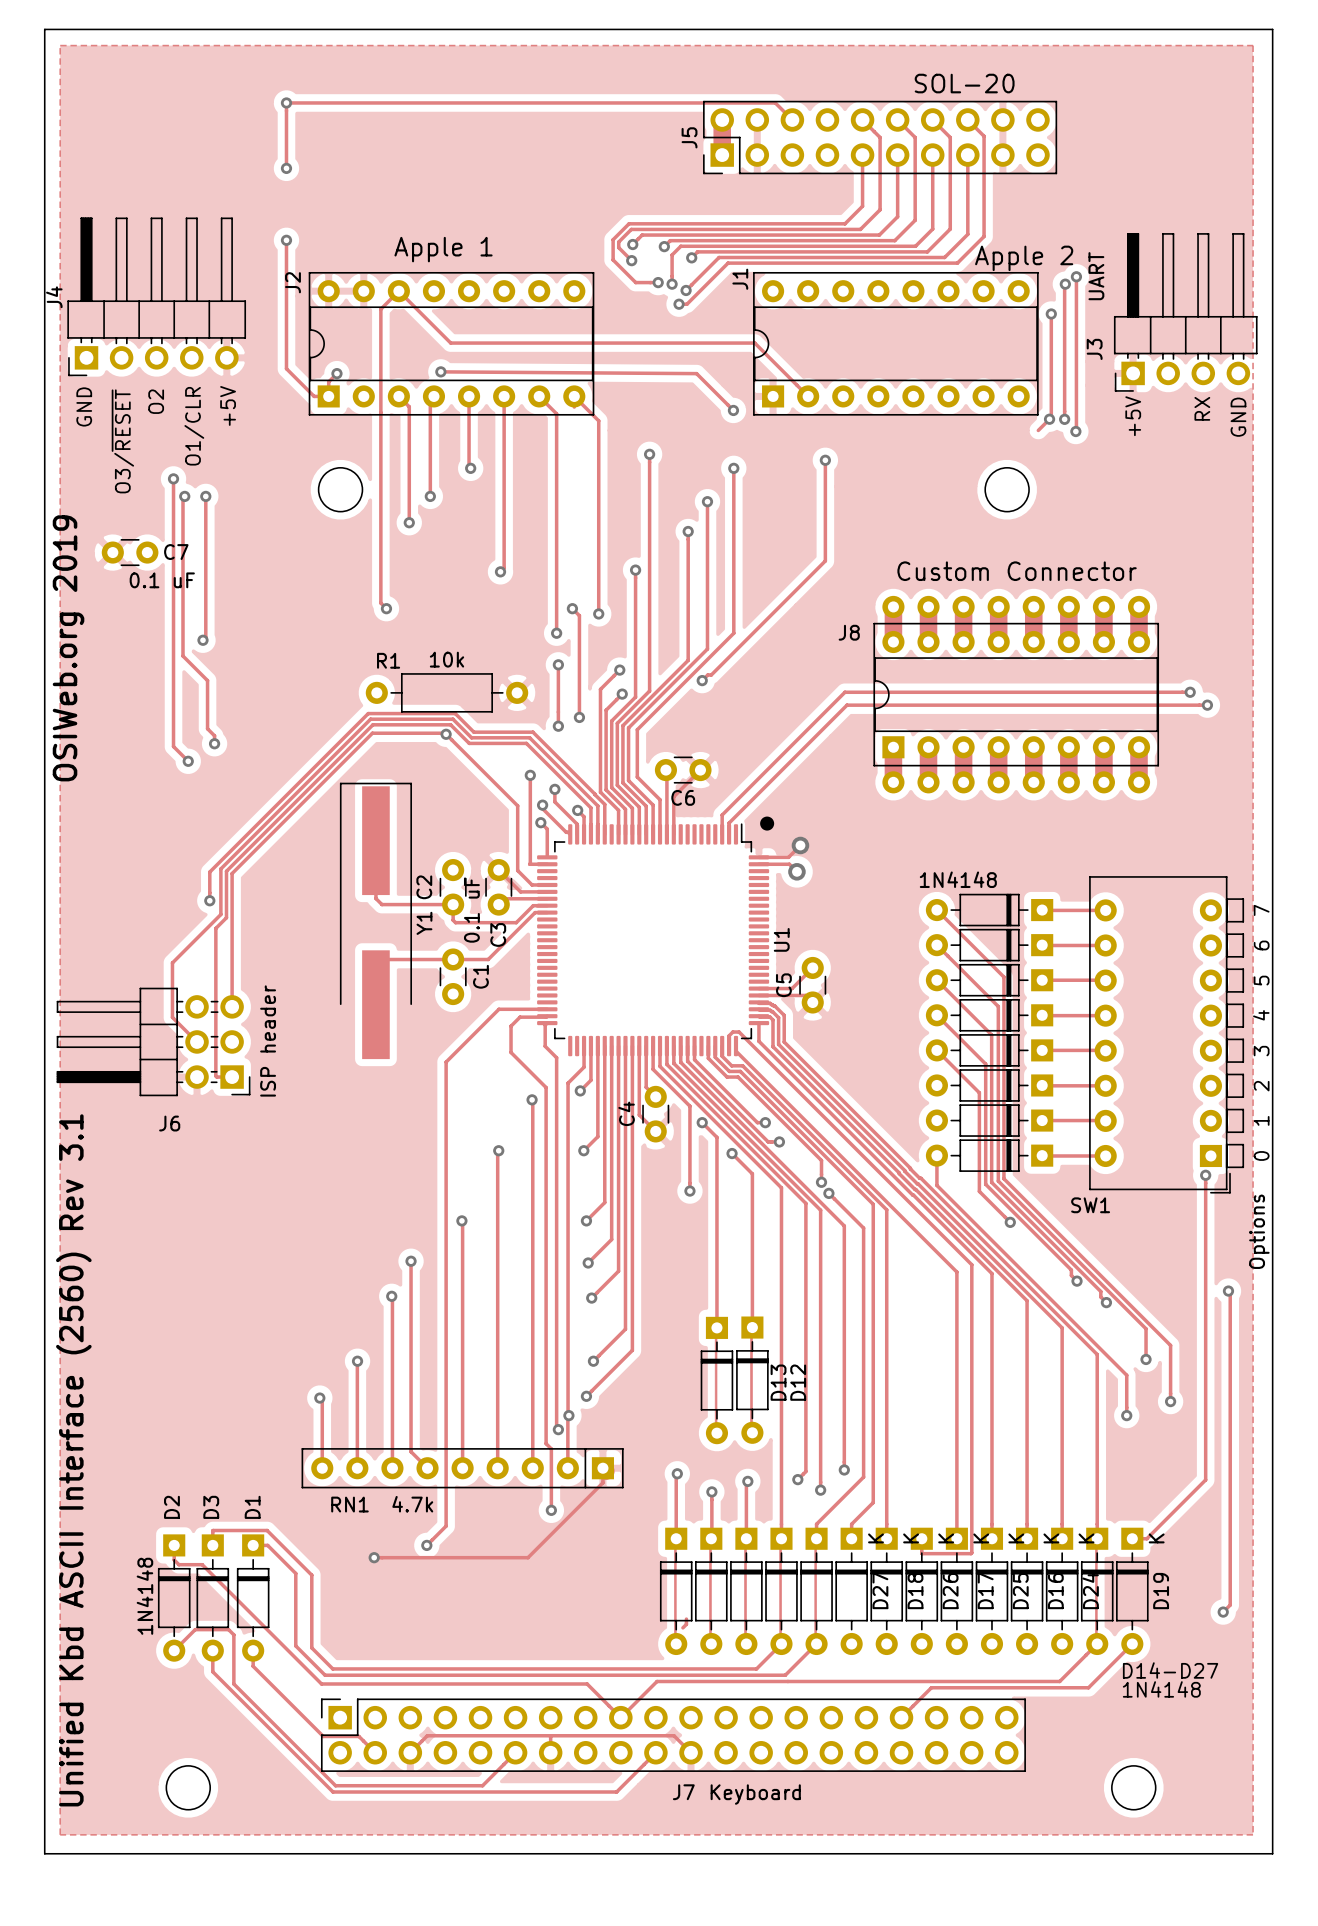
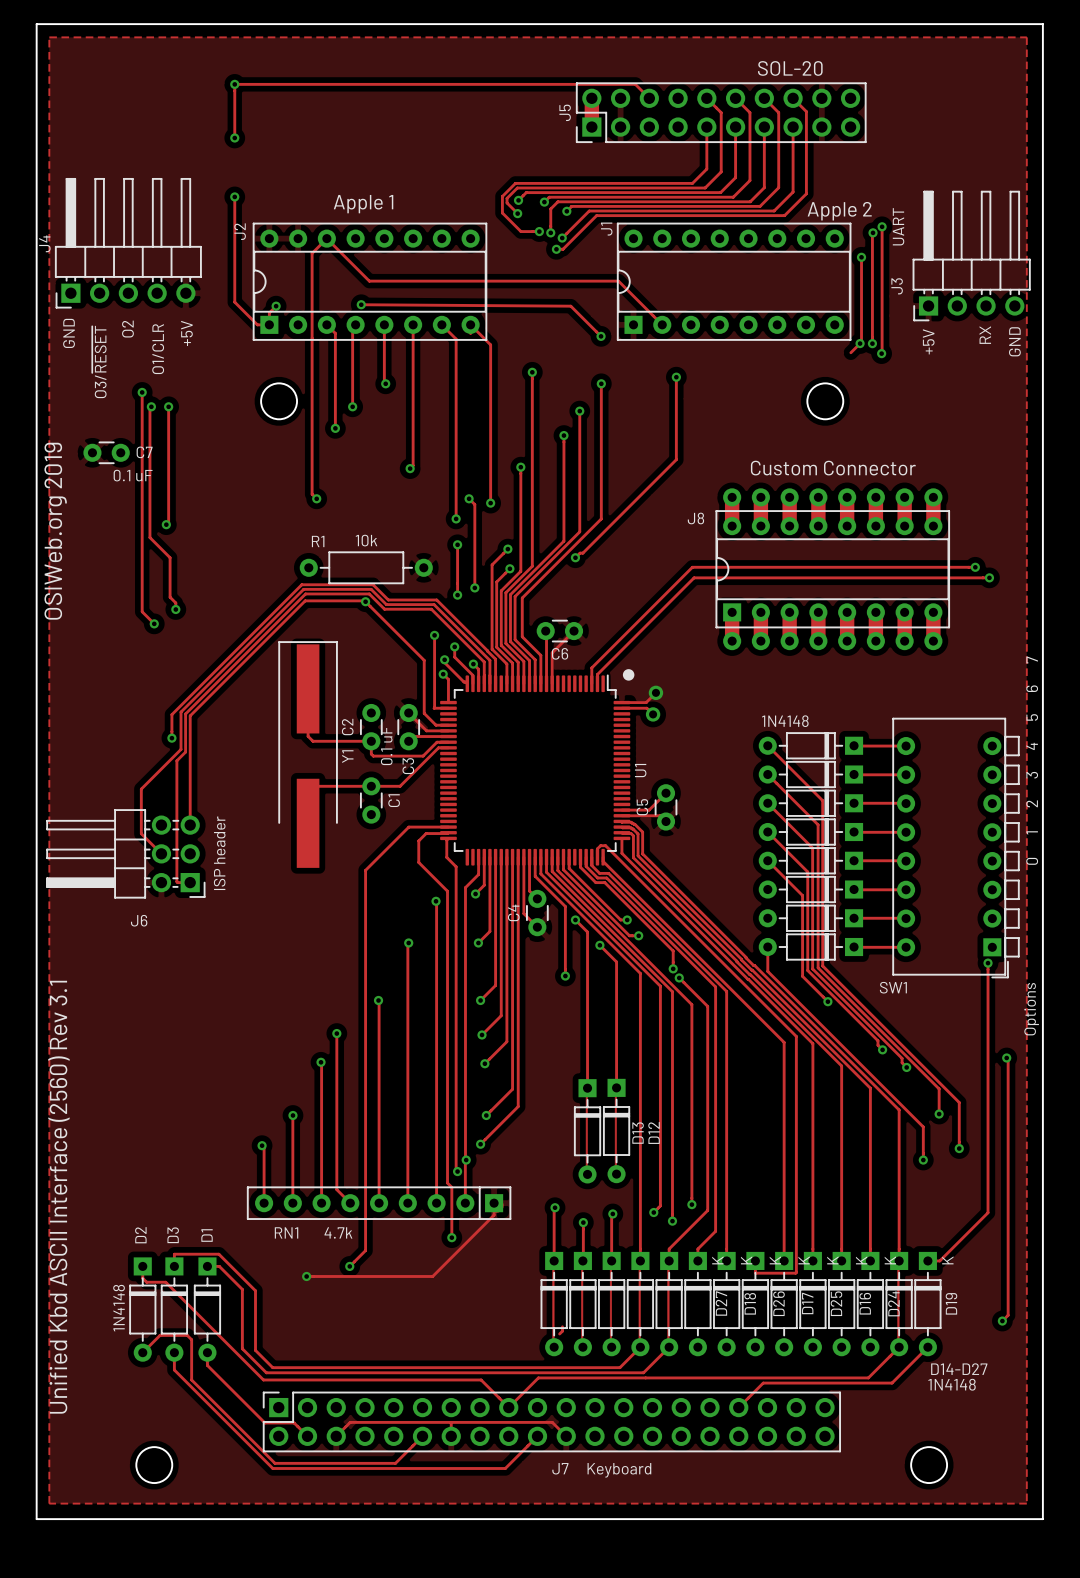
text position: 7 (1261, 910) -> 7 (1032, 659)
text position: 6 (1261, 945) -> 6 (1032, 688)
text position: 5 (1261, 980) -> 5 (1032, 717)
text position: 4 (1261, 1015) -> 4 (1032, 746)
text position: 3 (1261, 1051) -> 3 (1032, 775)
text position: 2 (1261, 1086) -> 2 (1032, 803)
text position: 1 (1261, 1120) -> 1 (1032, 832)
text position: 0 (1261, 1155) -> 0 (1032, 861)

